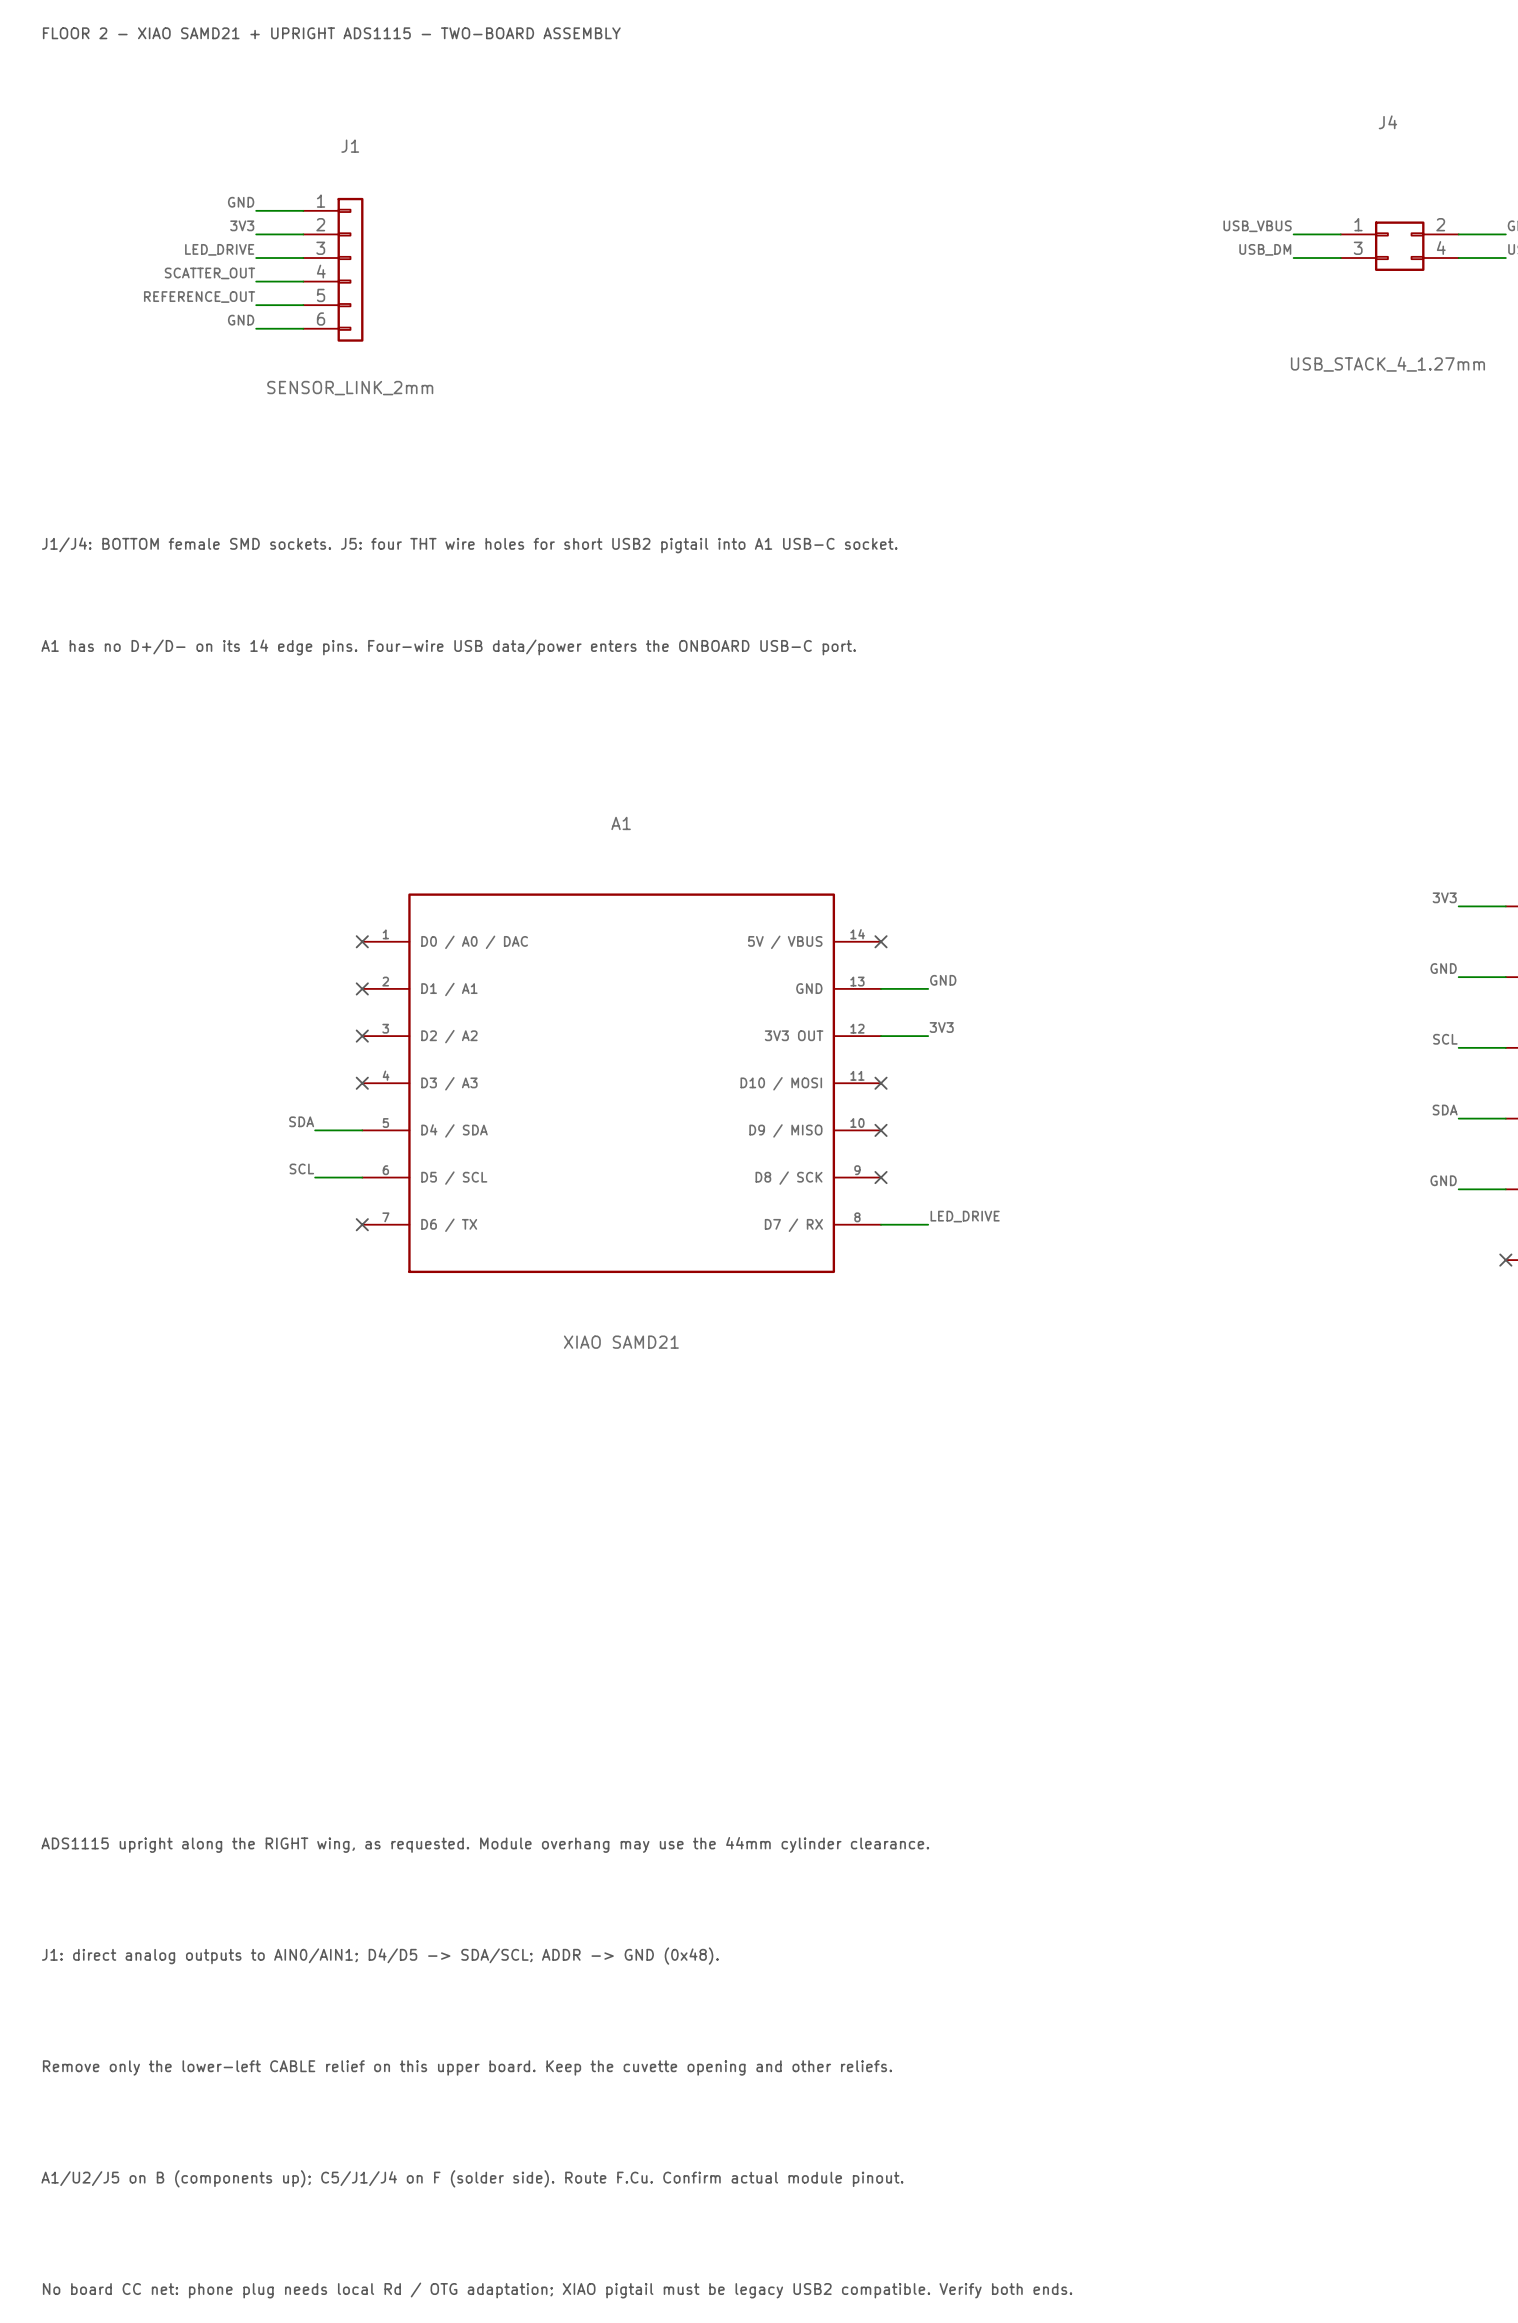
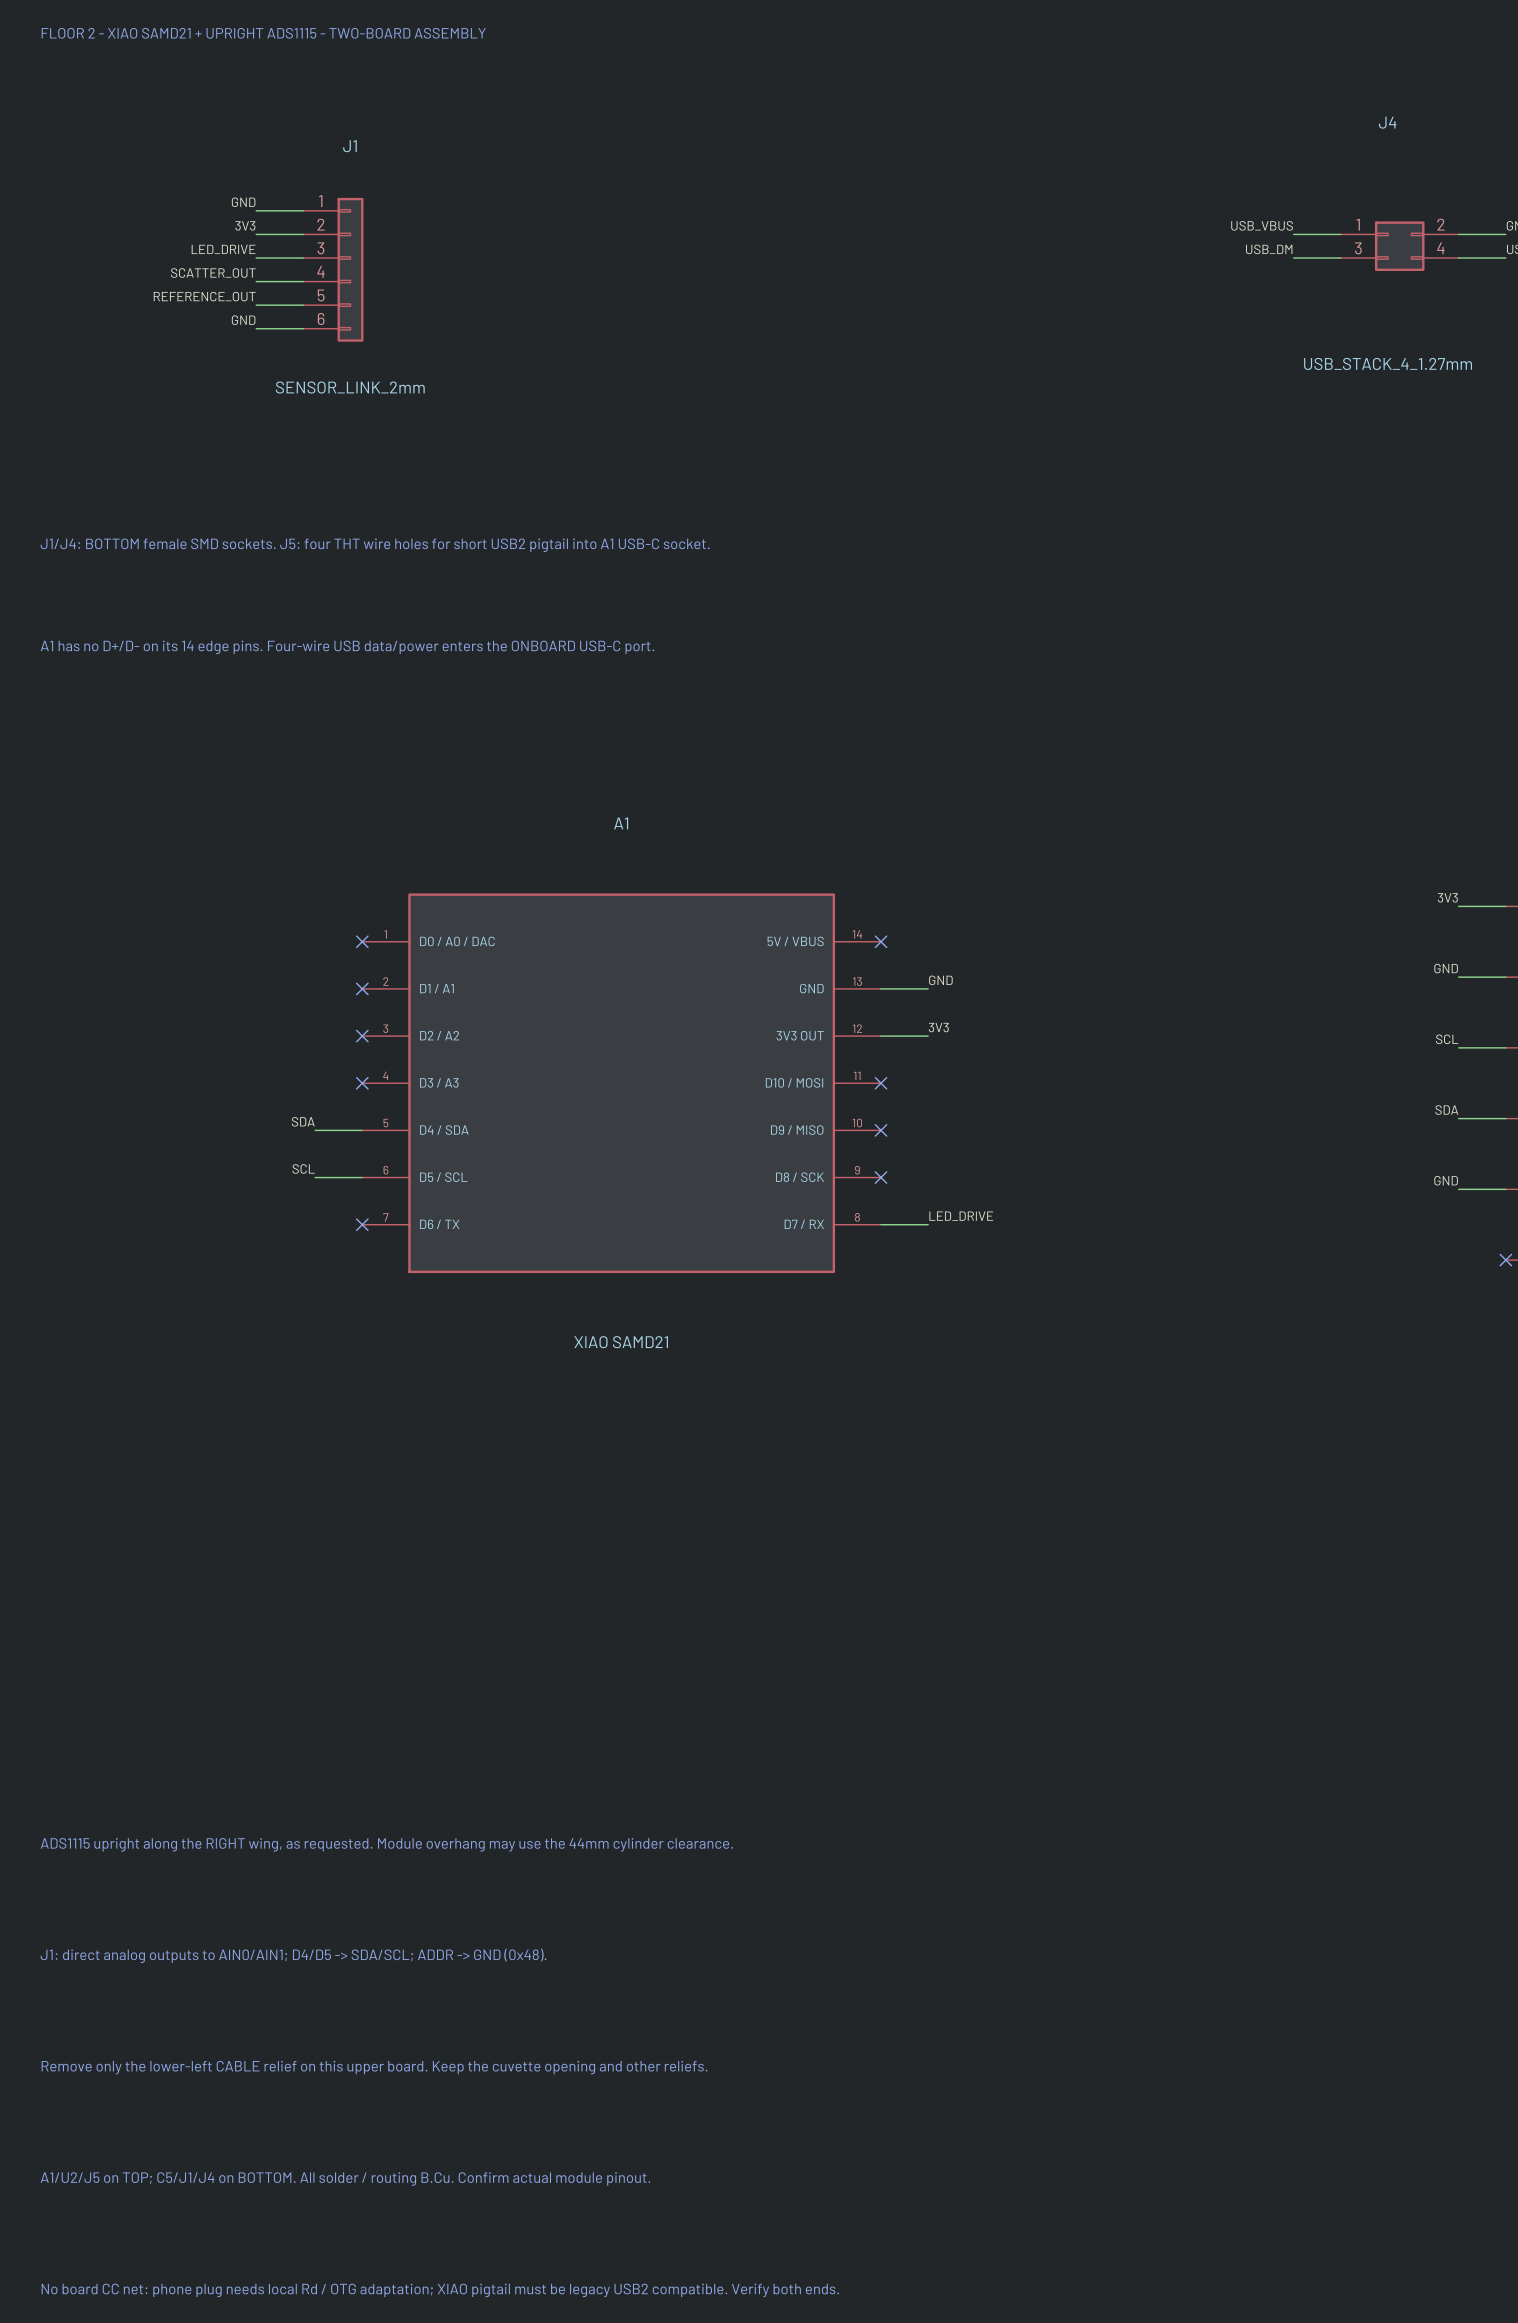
text: A1/U2/J5 on B (components up); C5/J1/J4 on F (solder side). Route F.Cu. Confirm actual module pinout. (472, 2178) -> A1/U2/J5 on TOP; C5/J1/J4 on BOTTOM. All solder / routing B.Cu. Confirm actual module pinout. (345, 2179)

